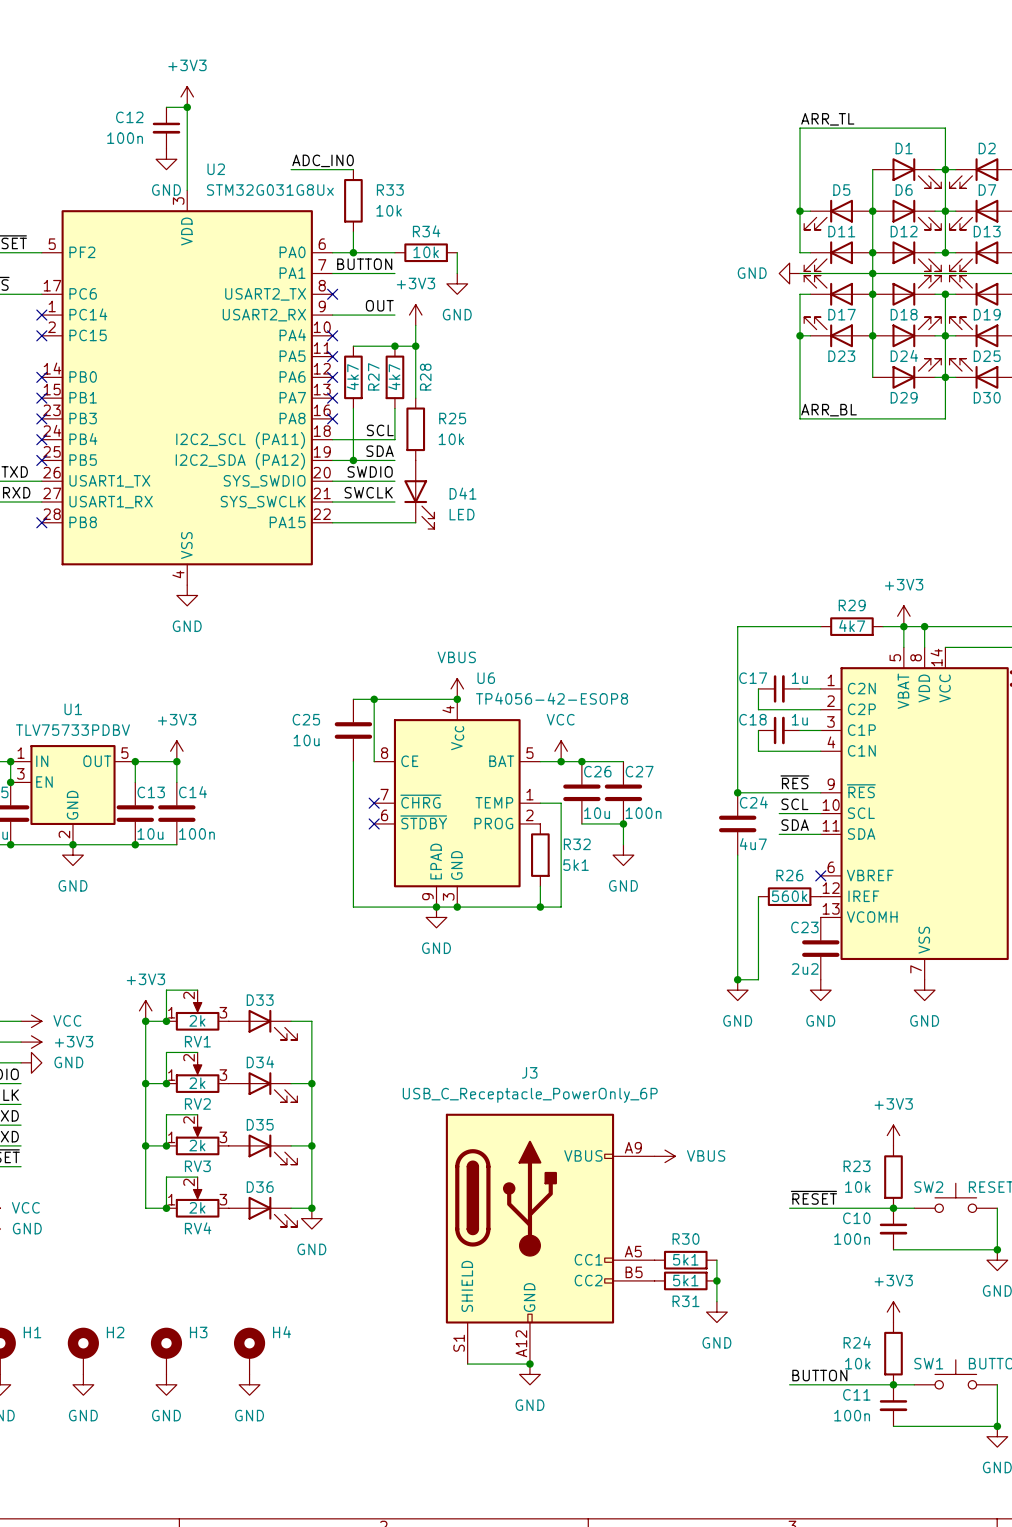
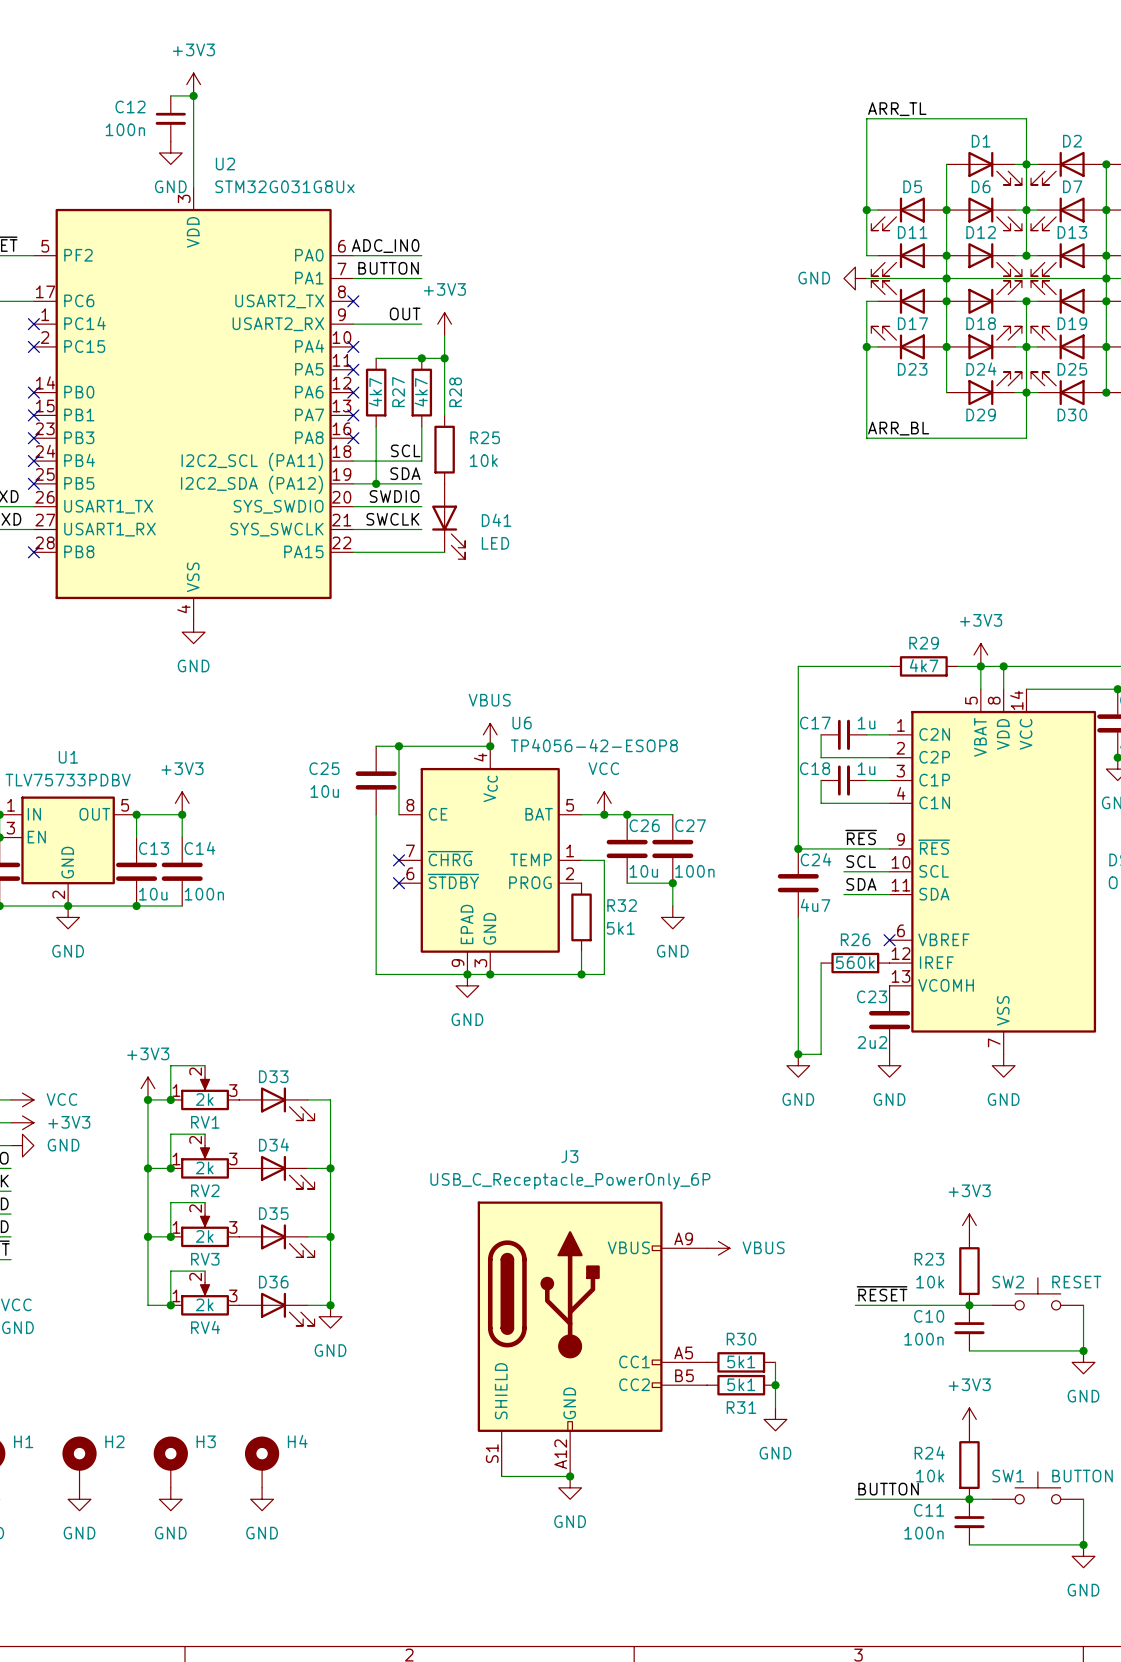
label position: ADC_IN0 (323, 160) -> ADC_IN0 (385, 246)
wire: (291, 169) (353, 169) -> none
R33: 10k (353, 200) -> none
wire: (353, 231) (353, 252) -> none
junction: (353, 252) -> none
R34: 10k (426, 252) -> none
wire: (457, 252) (457, 273) -> none
power symbol: GND (457, 283) -> none

